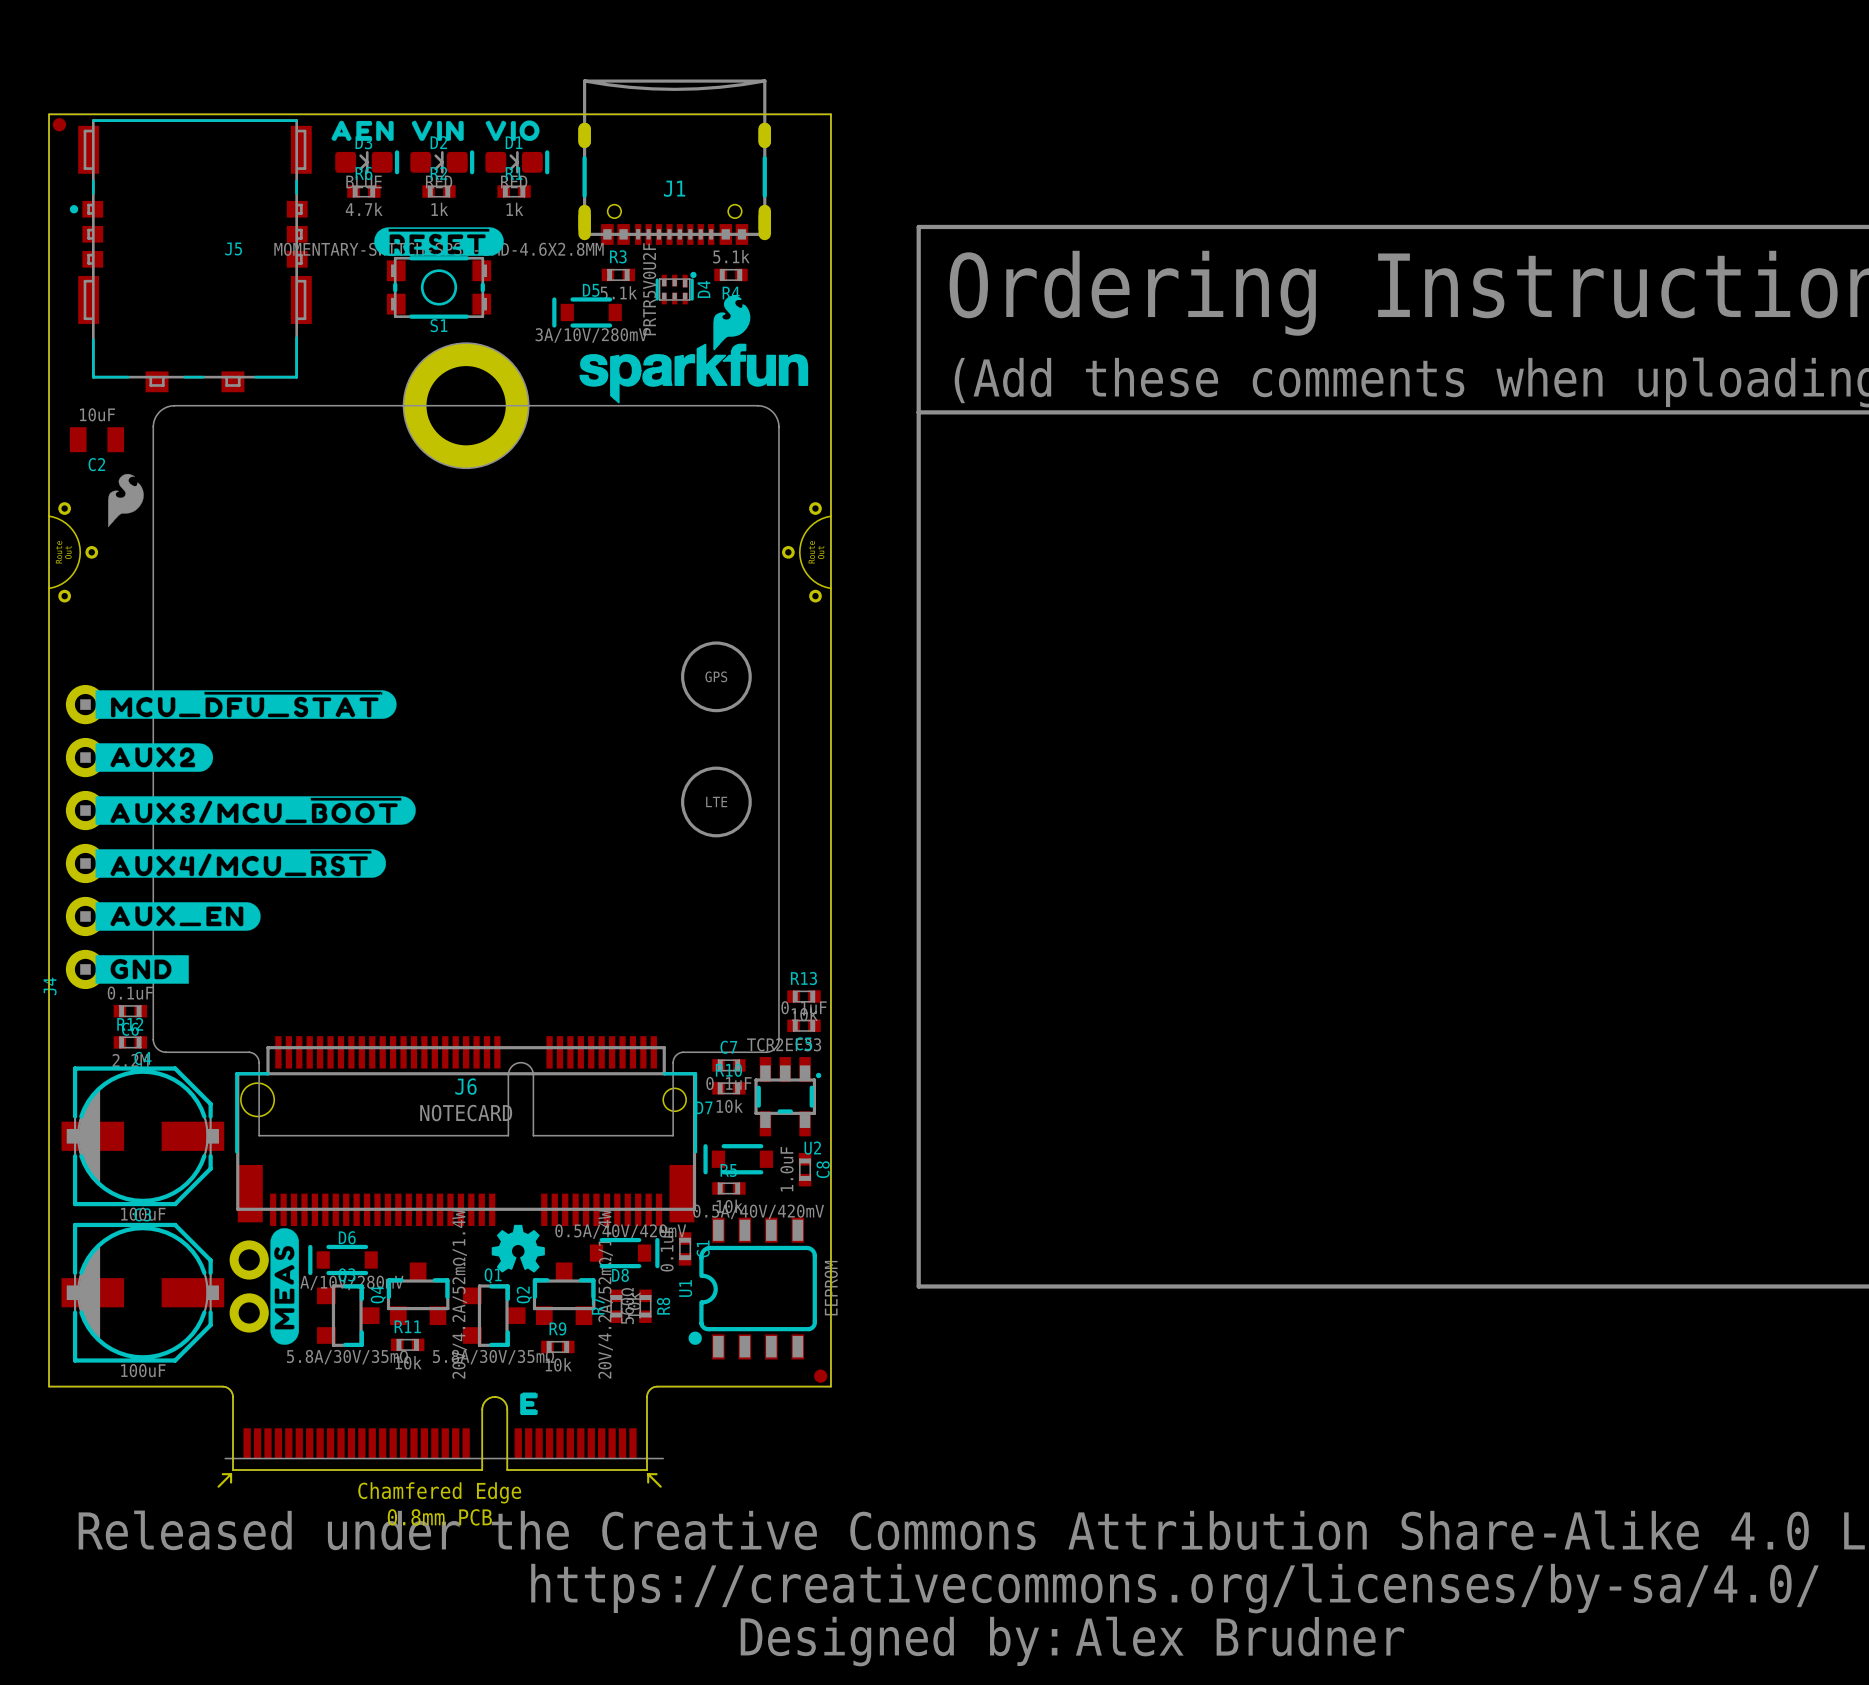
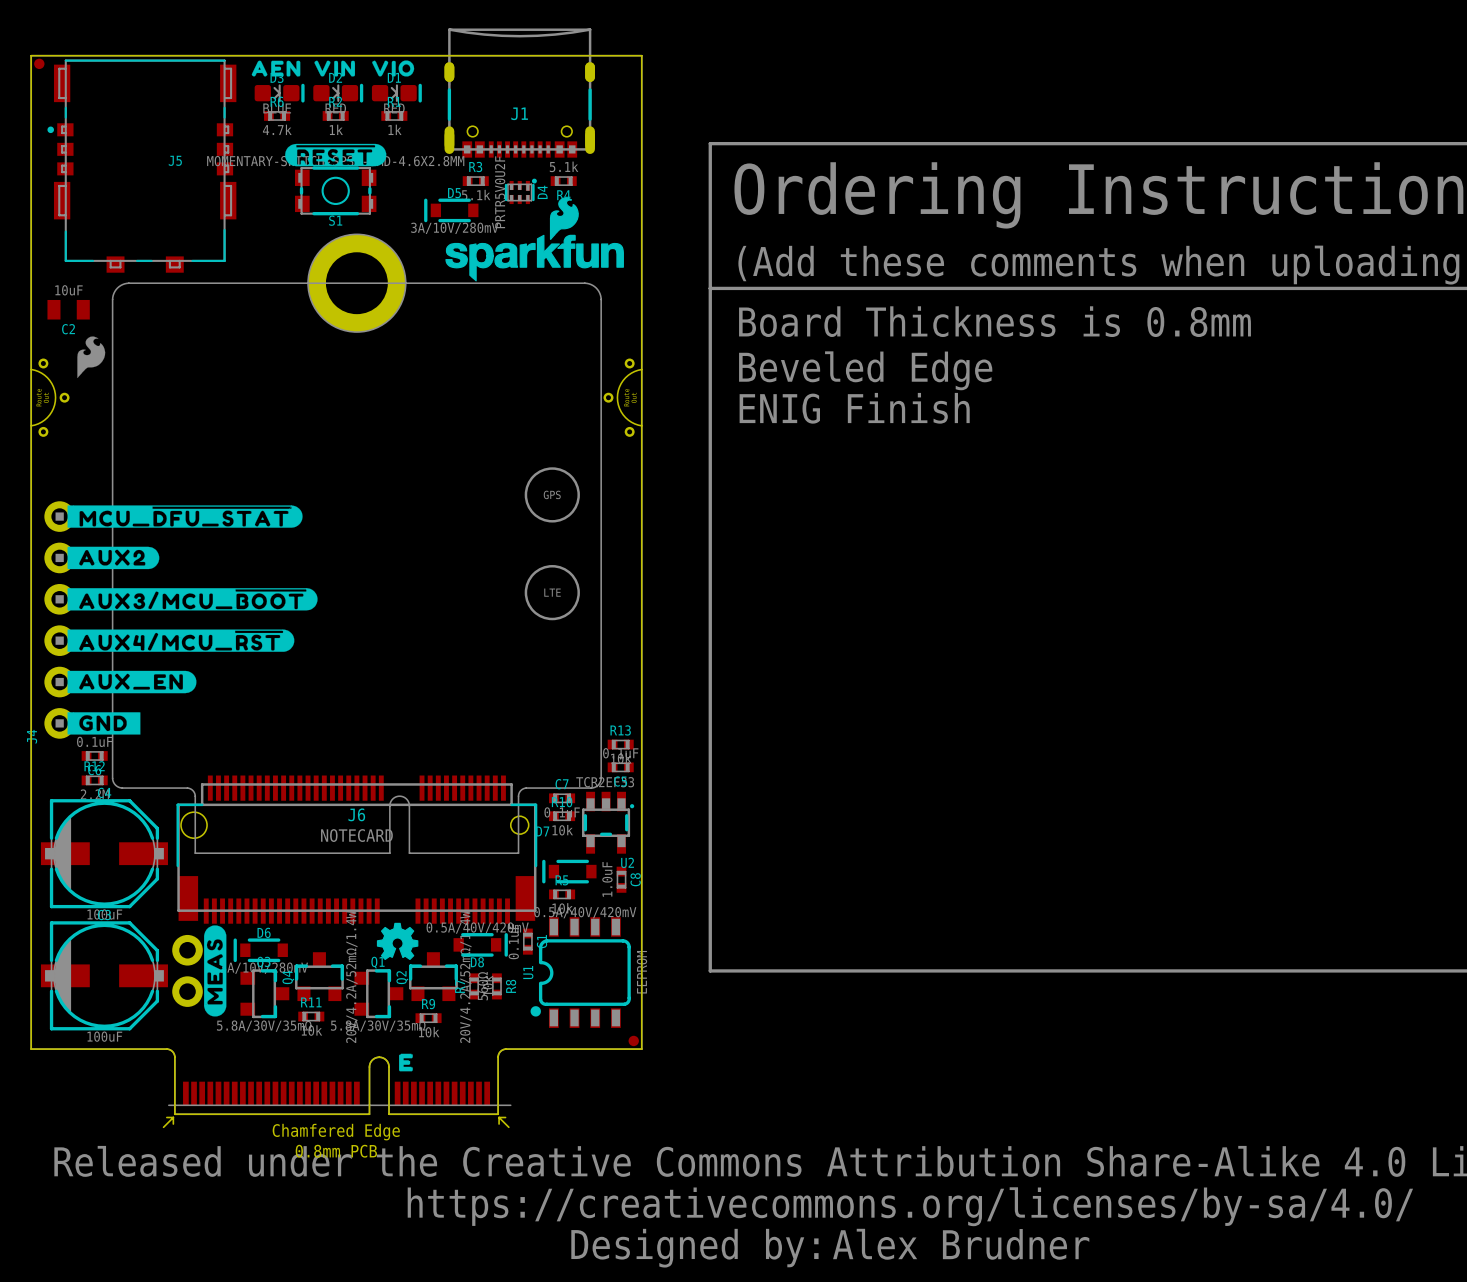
text: none -> Board Thickness is 0.8mm (995, 321)
text: none -> Beveled Edge (865, 370)
text: none -> ENIG Finish (854, 408)

